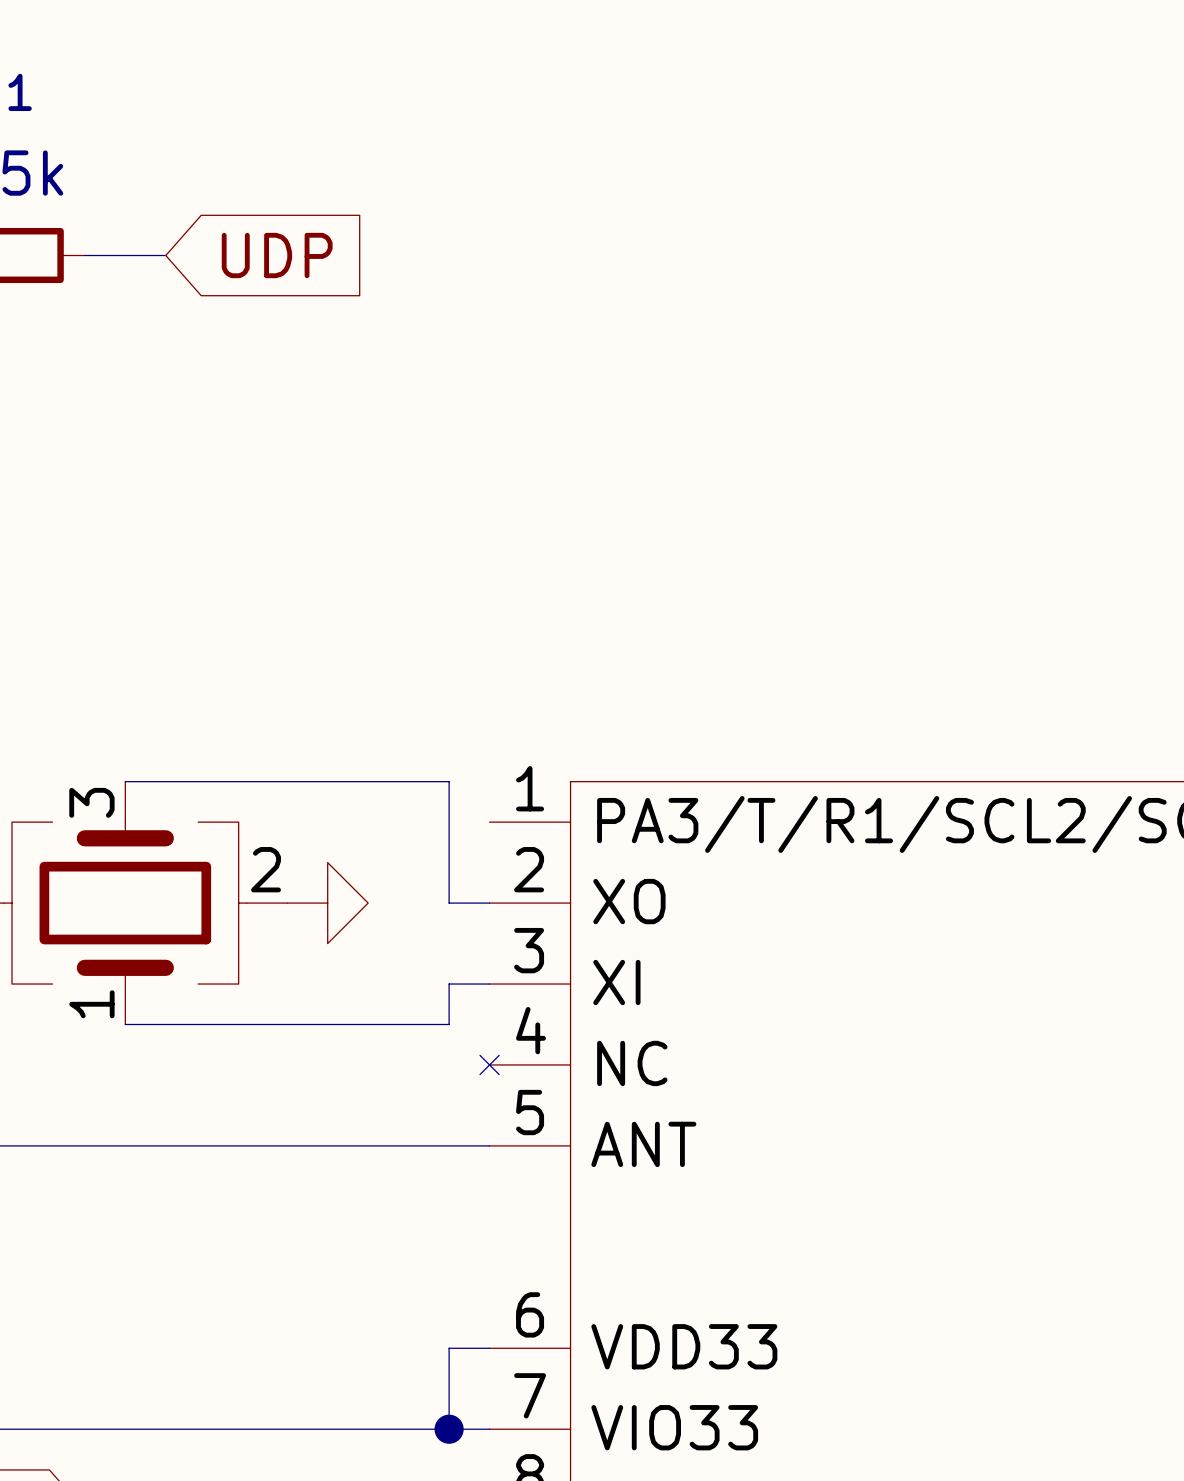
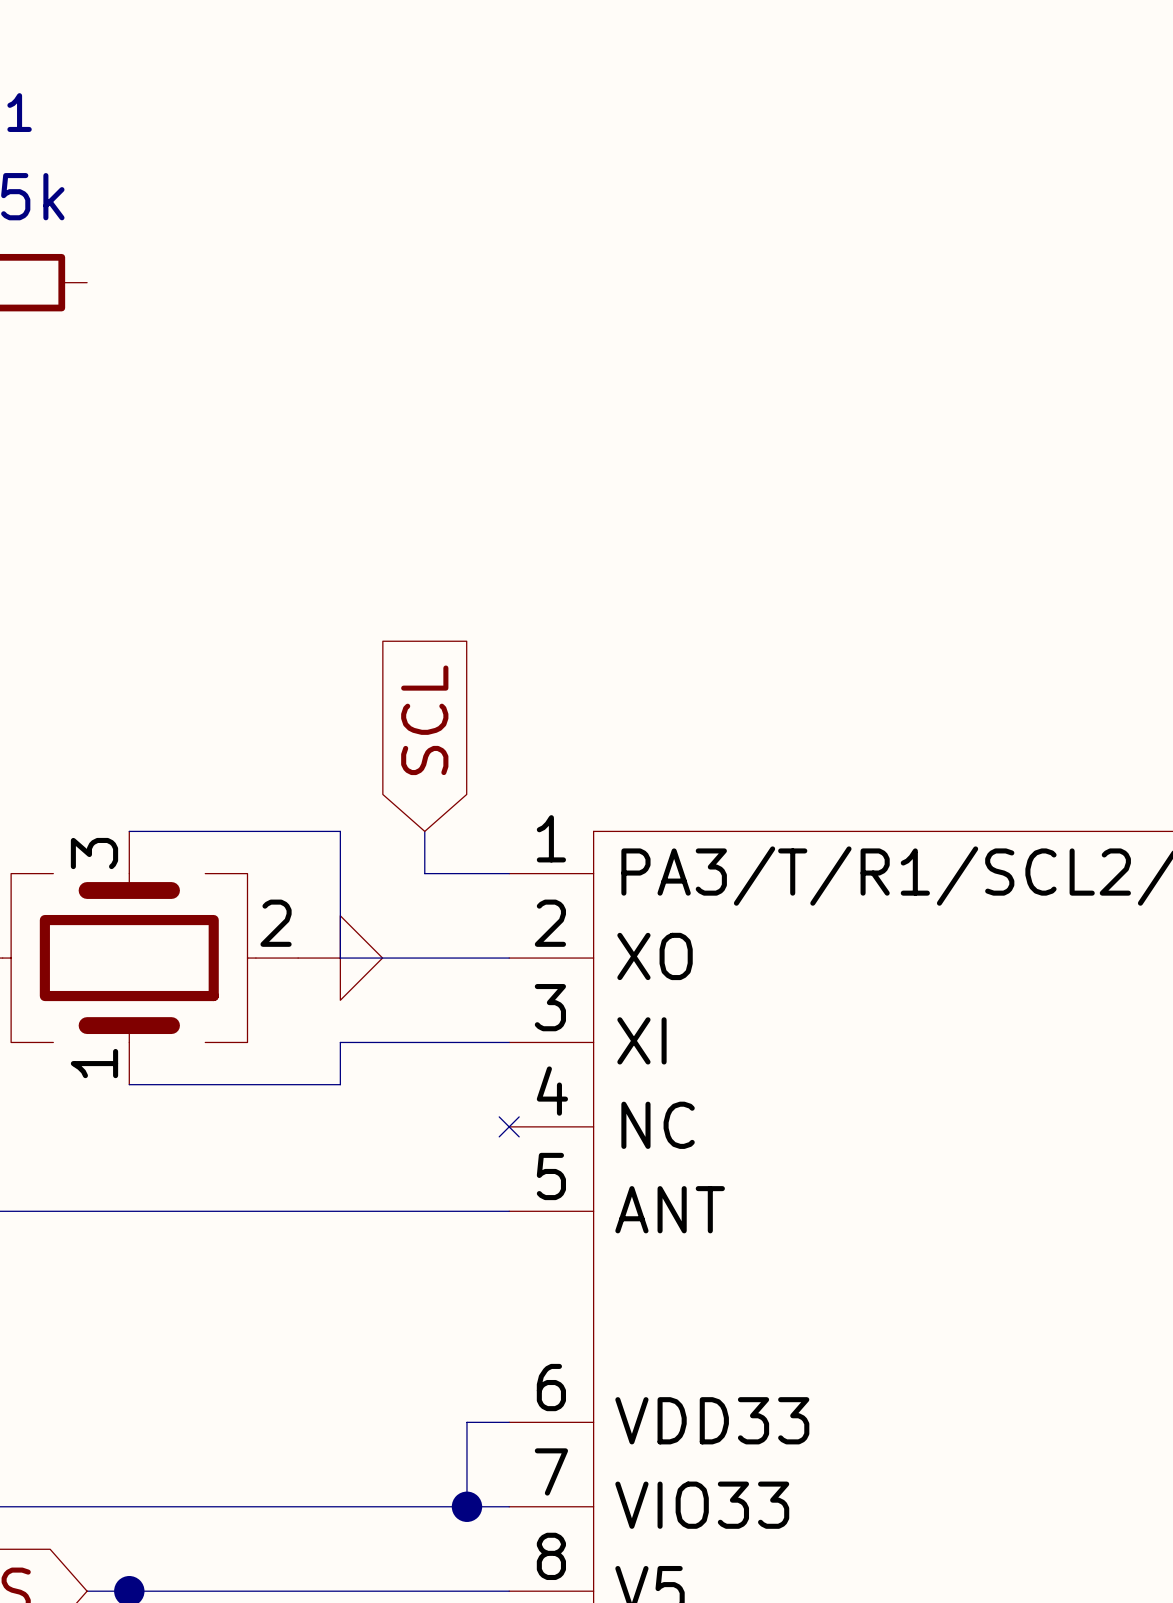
wire: (84, 255) (165, 255) -> none
global label: UDP (277, 255) -> none
global label: none -> SCL (424, 720)
wire: (327, 781) (449, 781) (449, 903) -> (340, 831) (340, 958) (466, 958)
wire: none -> (424, 831) (424, 873) (509, 873)
wire: (449, 984) (449, 1024) (327, 1024) -> (466, 1042) (340, 1042) (340, 1084)

